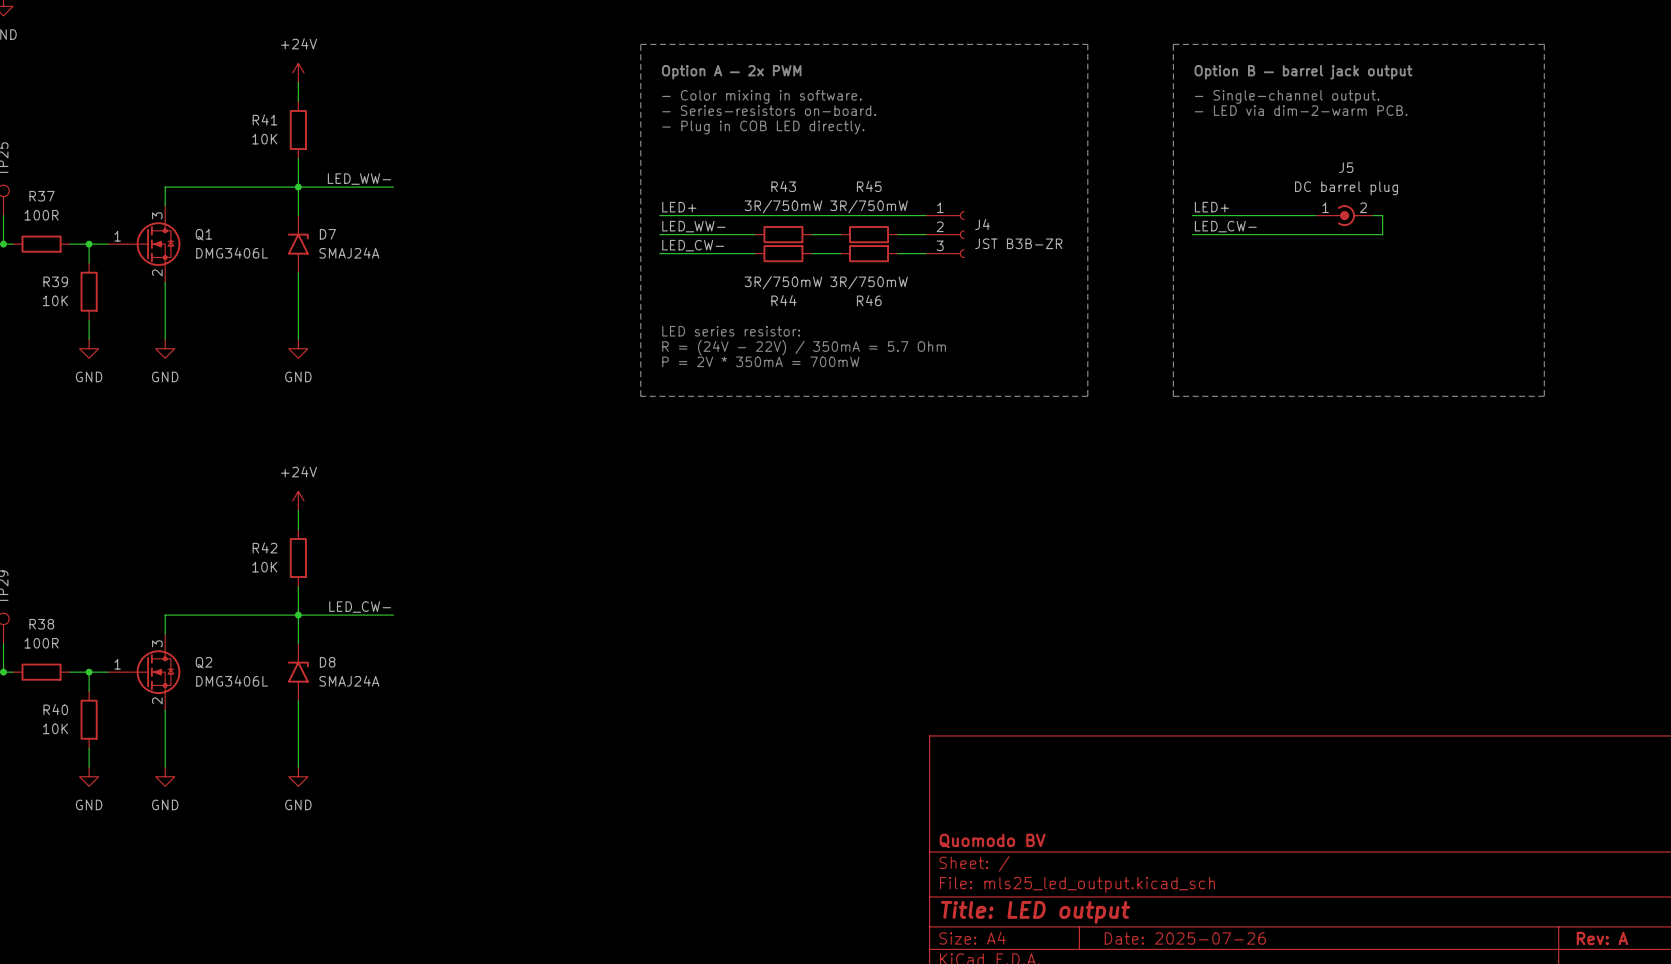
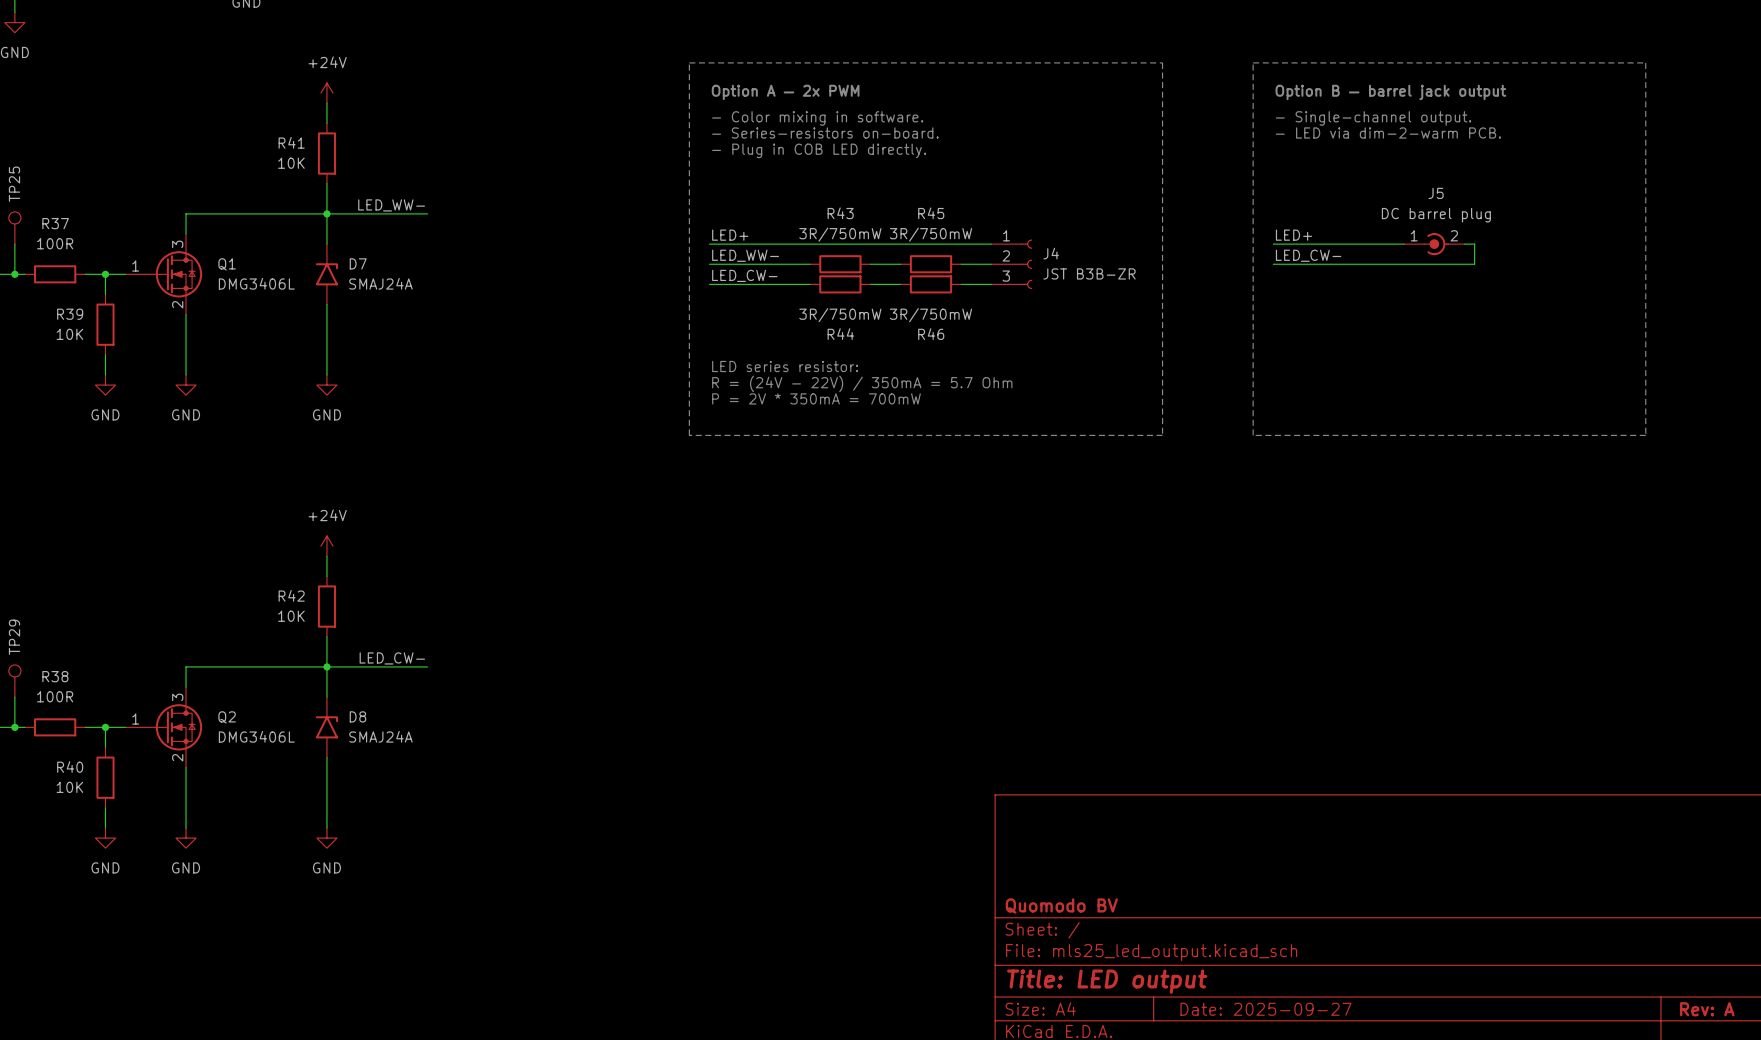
title block: Date: 2025-07-26 (1185, 938) -> Date: 2025-09-27 (1266, 1009)

